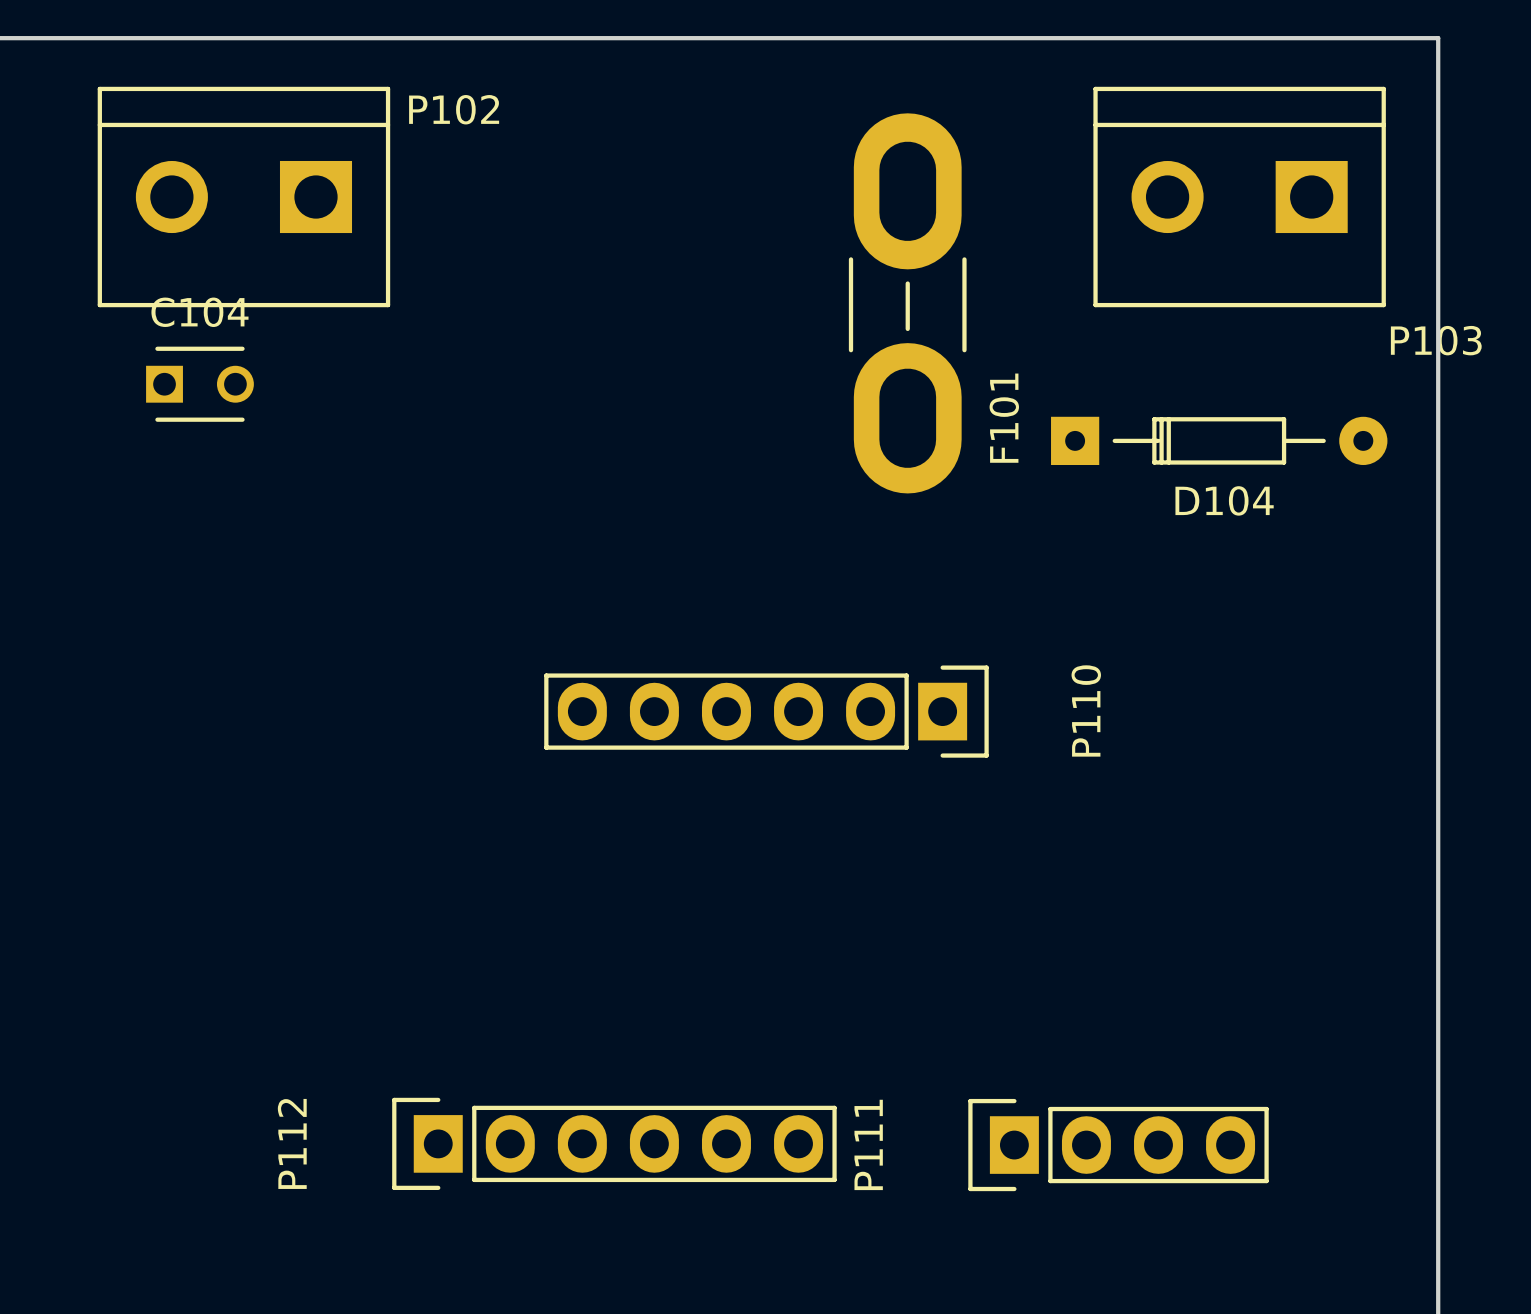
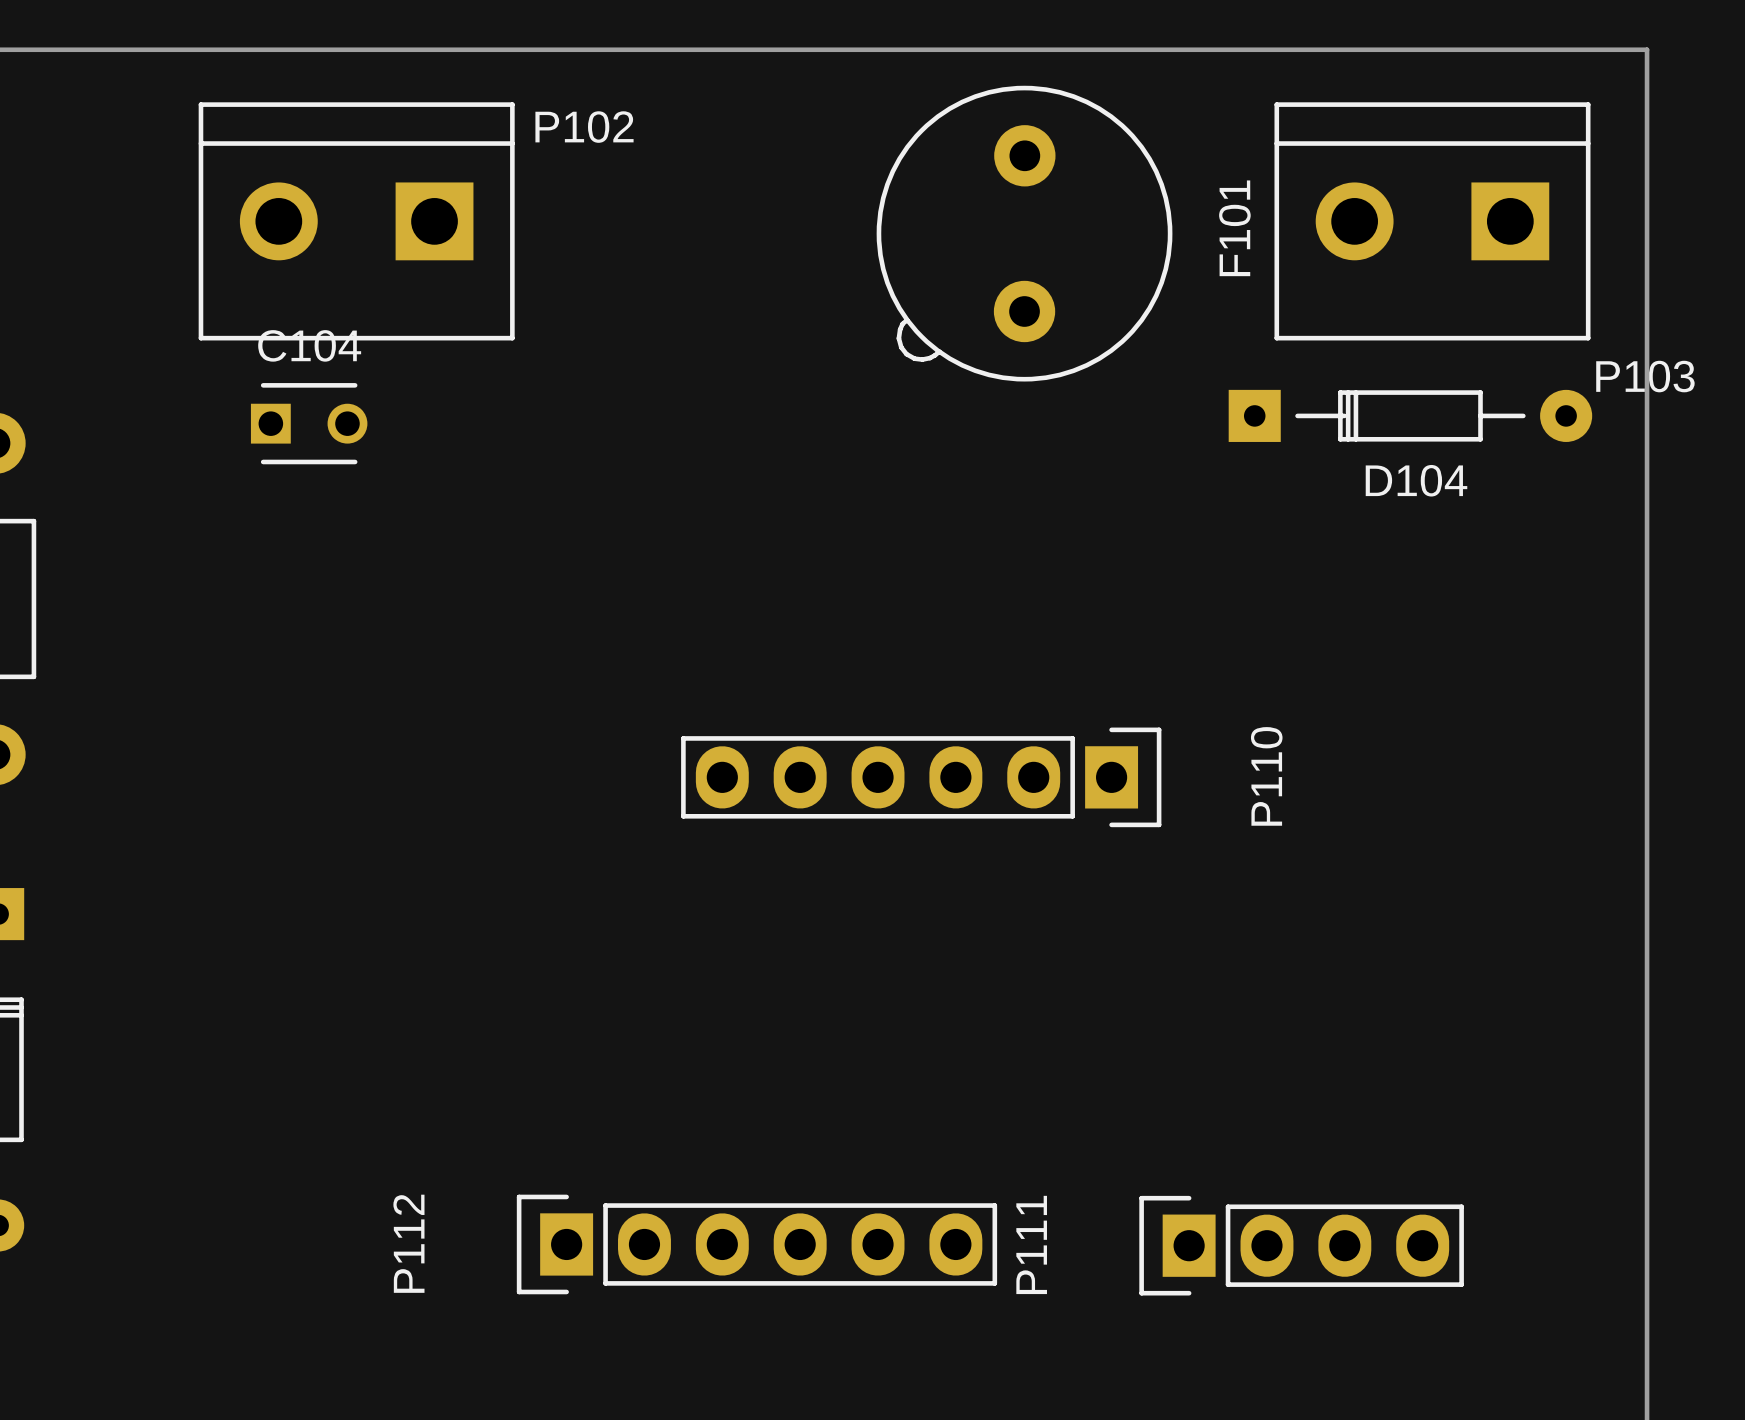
F101 footprint: [848, 113, 967, 494] -> [876, 85, 1173, 382]
F101 name position: F101 (1004, 418) -> F101 (1234, 228)
D104 position: (1219, 440) -> (1410, 415)

